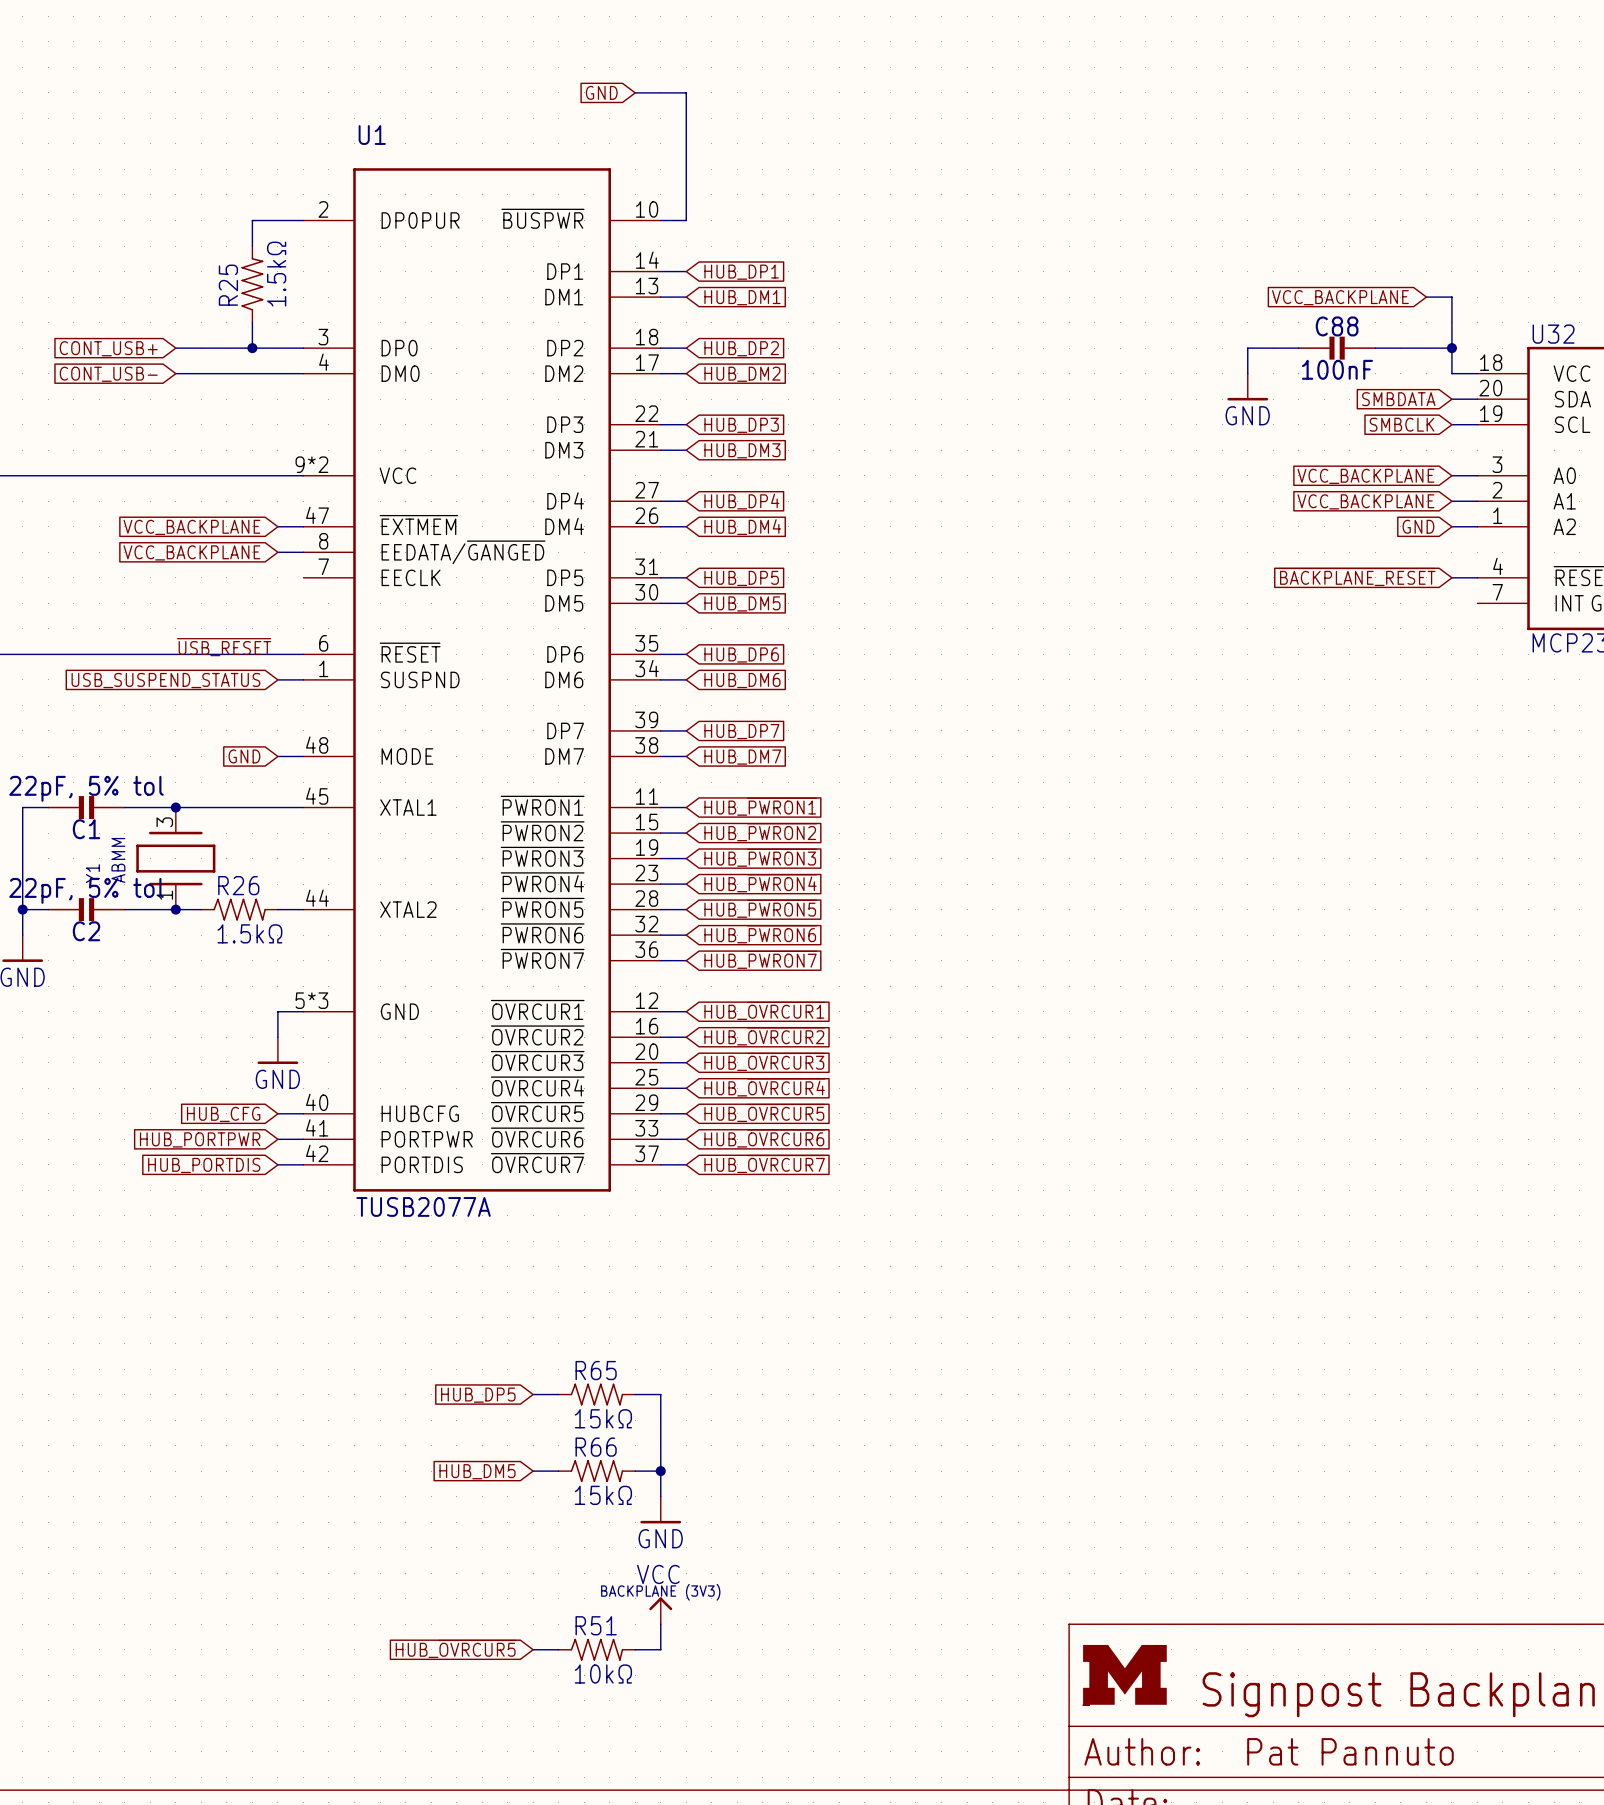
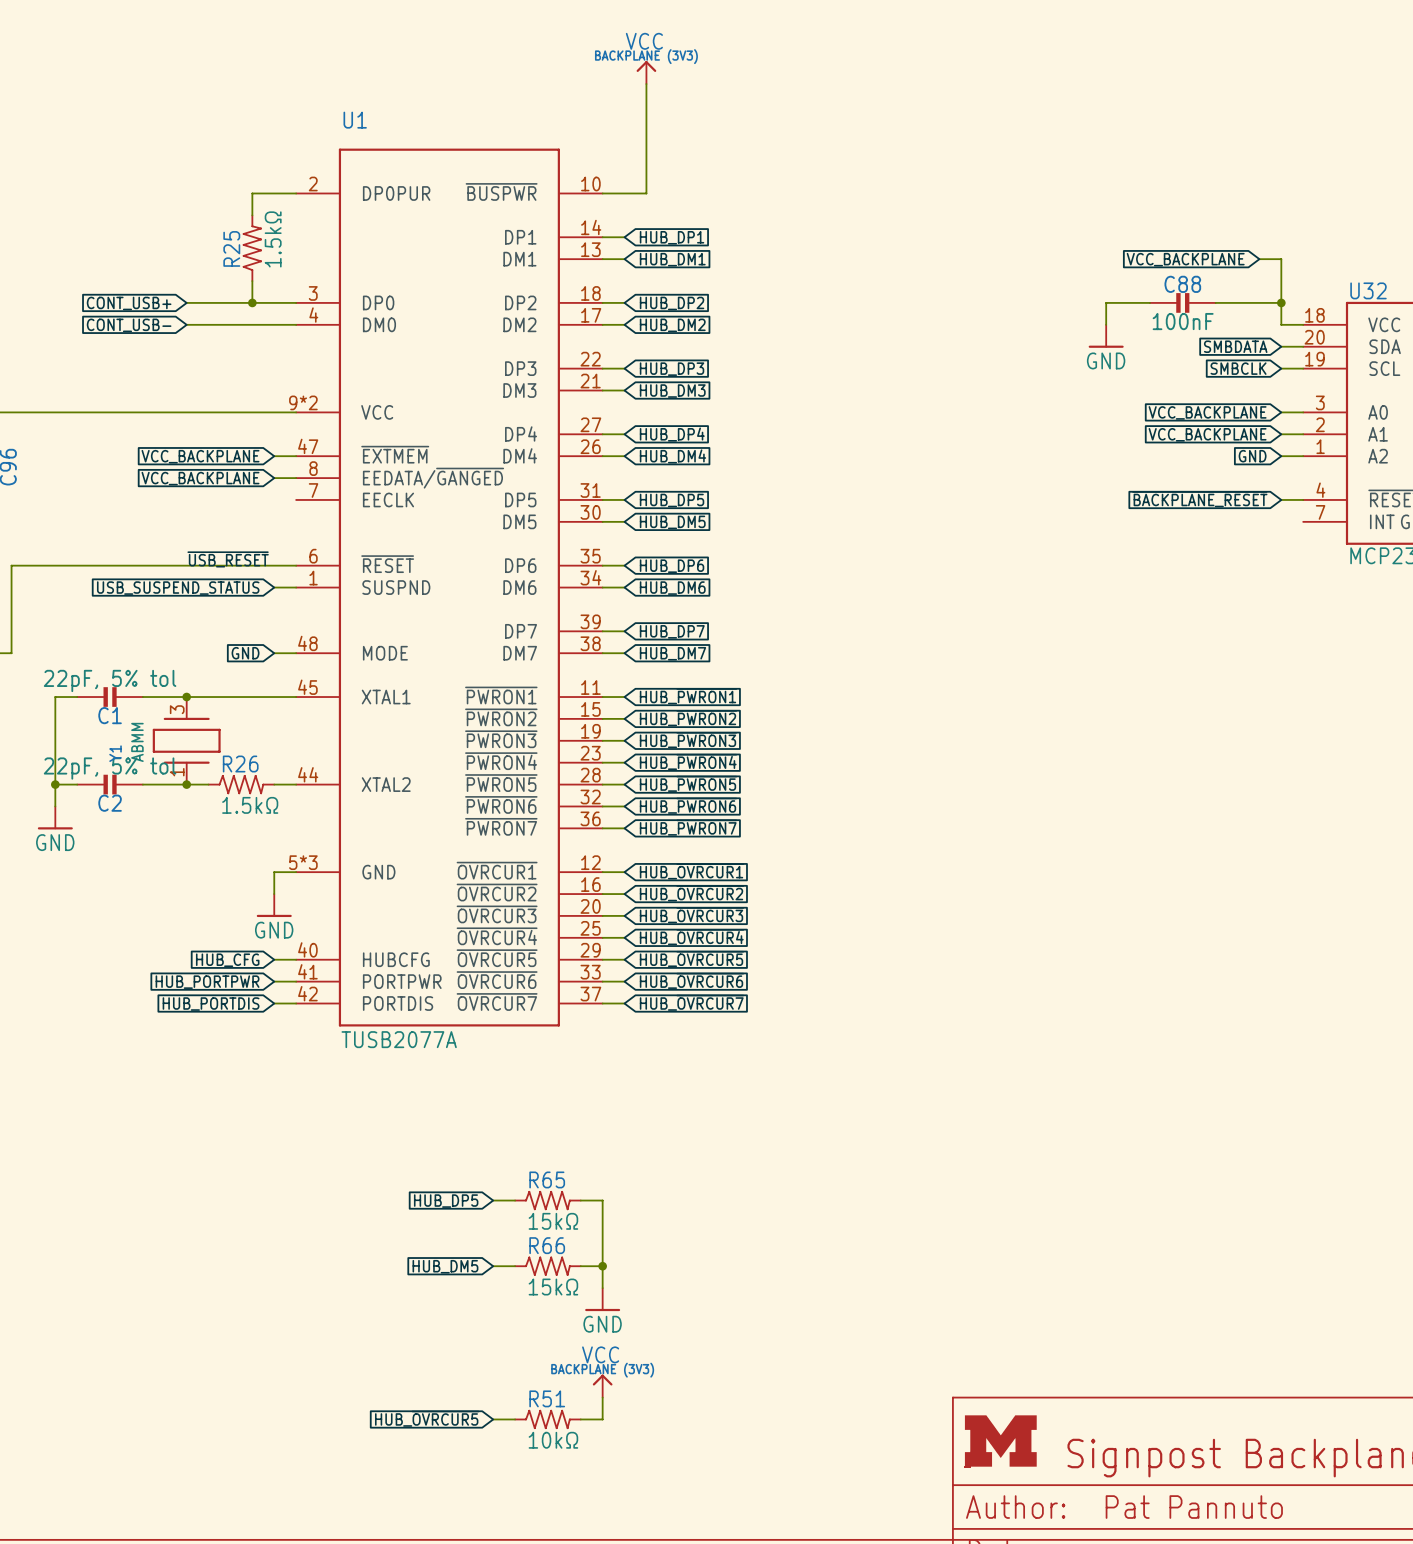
power symbol: none -> (646, 72)
global label: GND (601, 92) -> none
wire: (635, 92) (686, 92) (686, 220) -> (646, 84) (646, 193) (624, 193)

